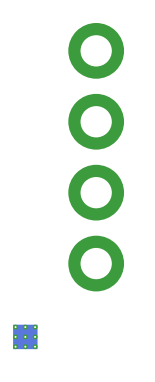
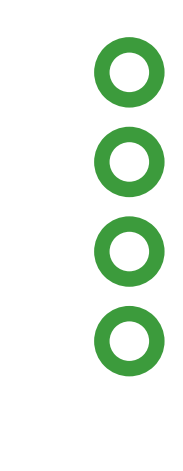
part: (25, 336) -> none

